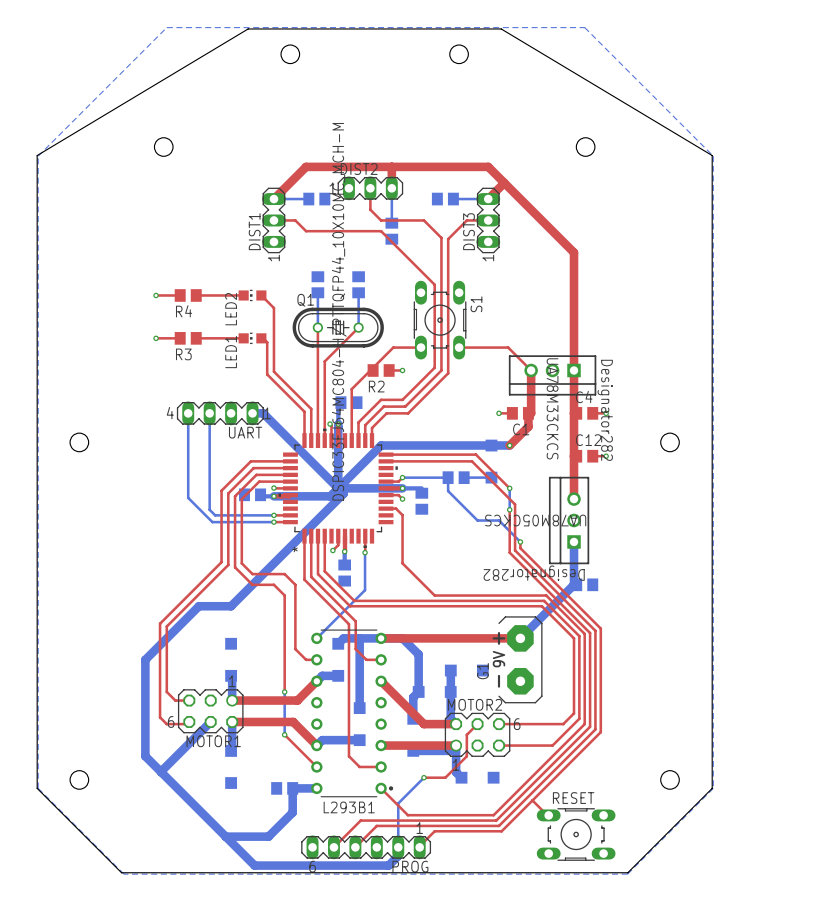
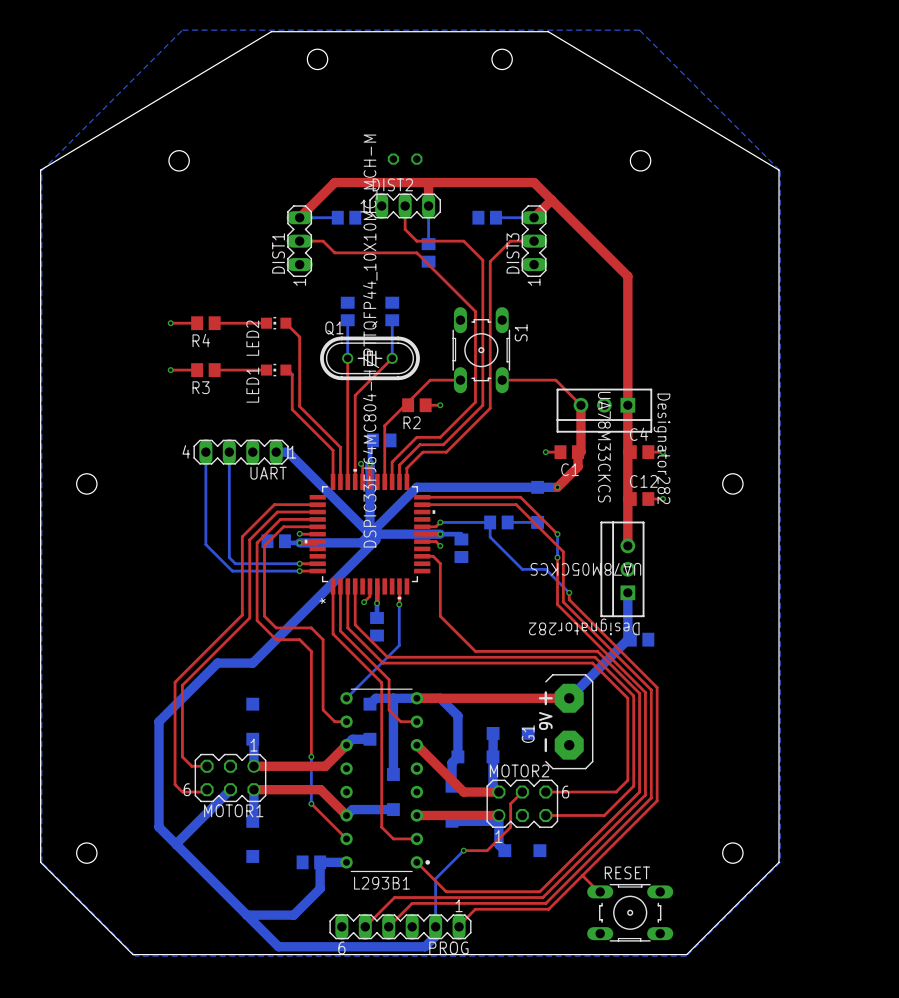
part: none -> (405, 159)

